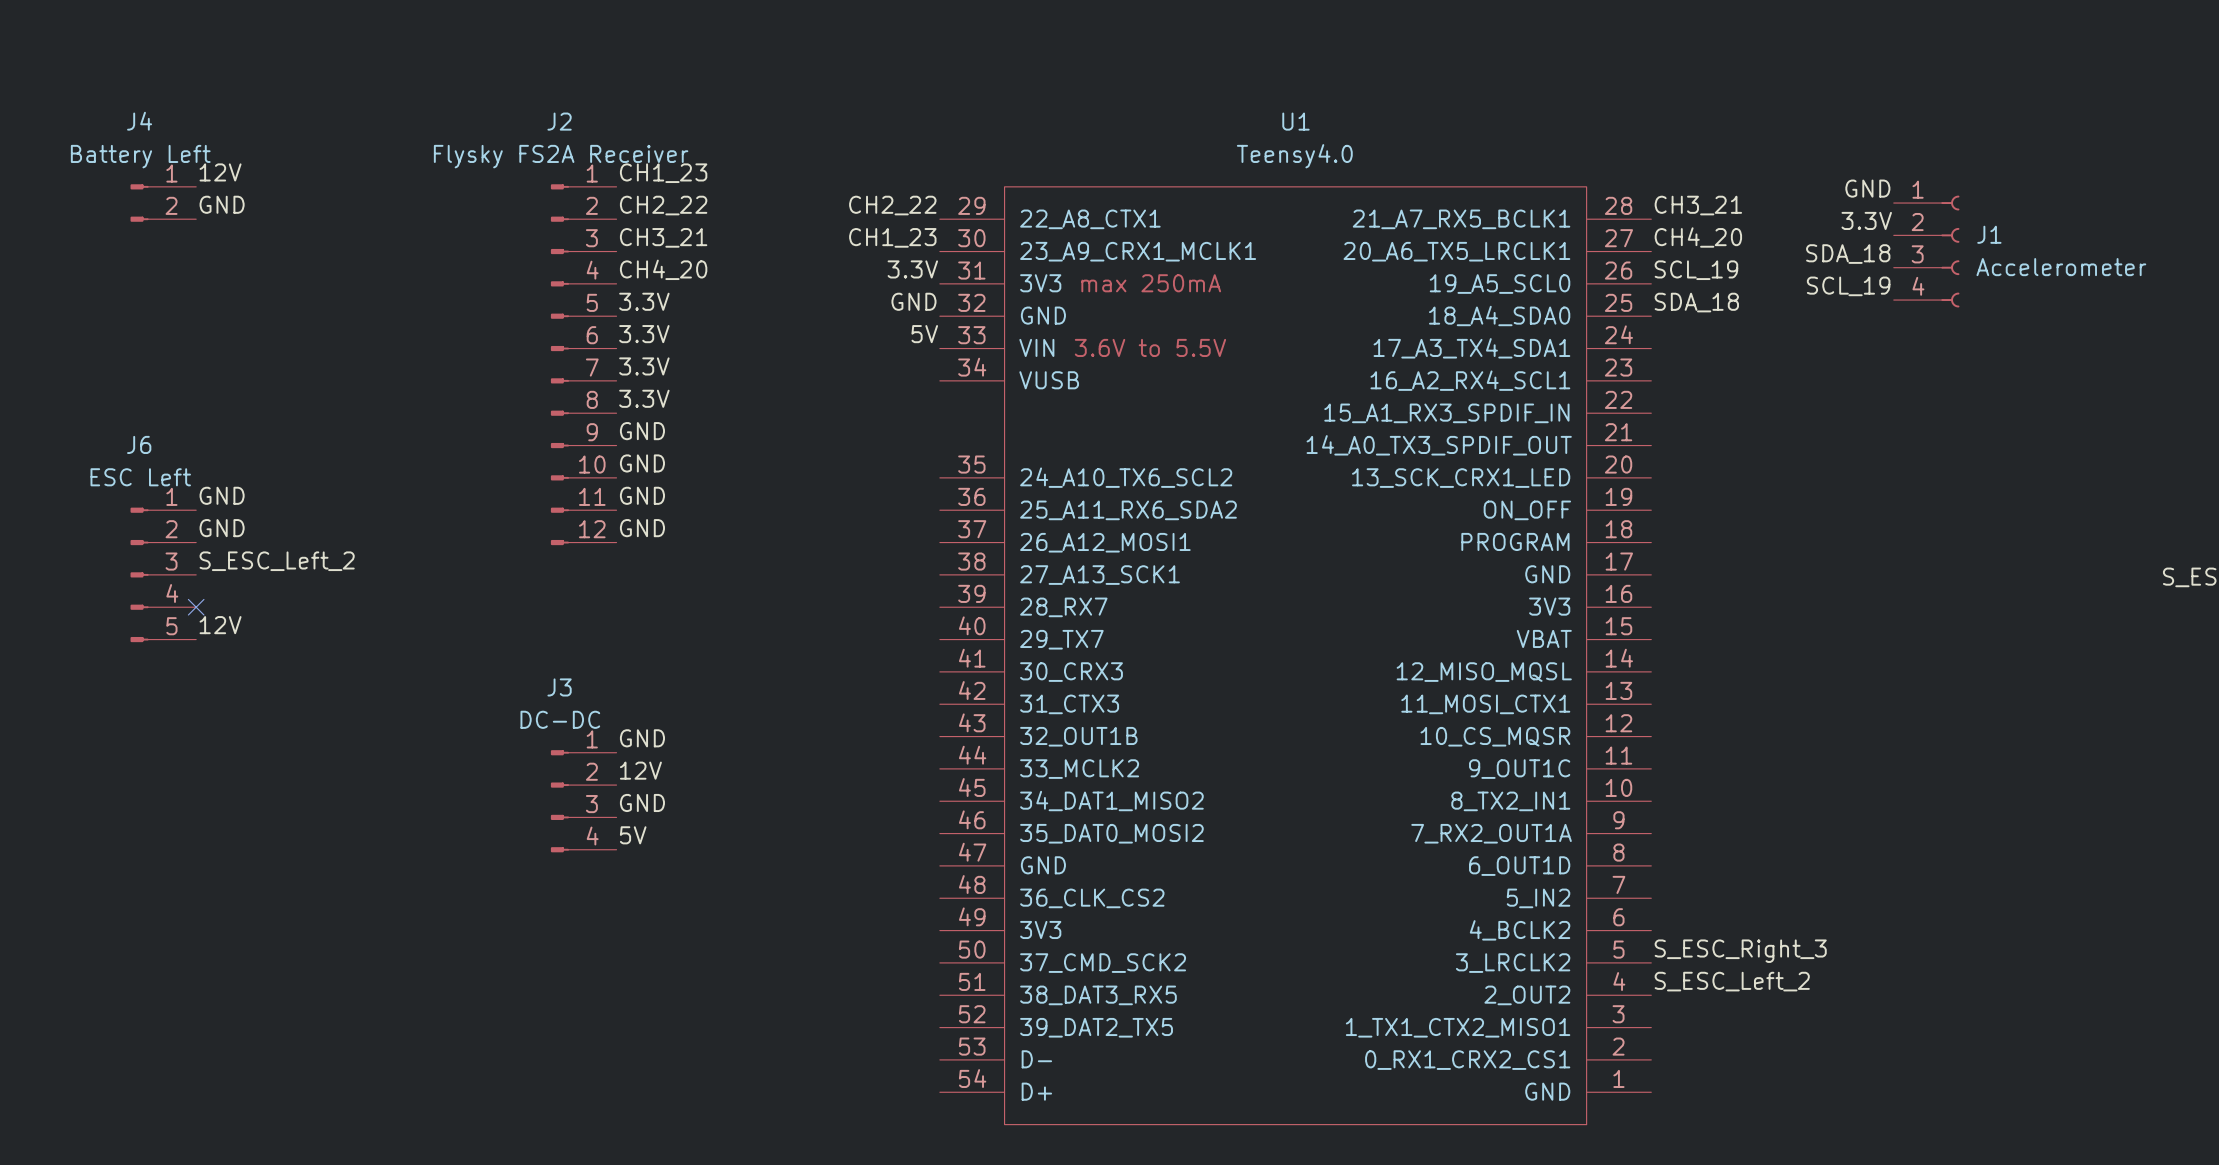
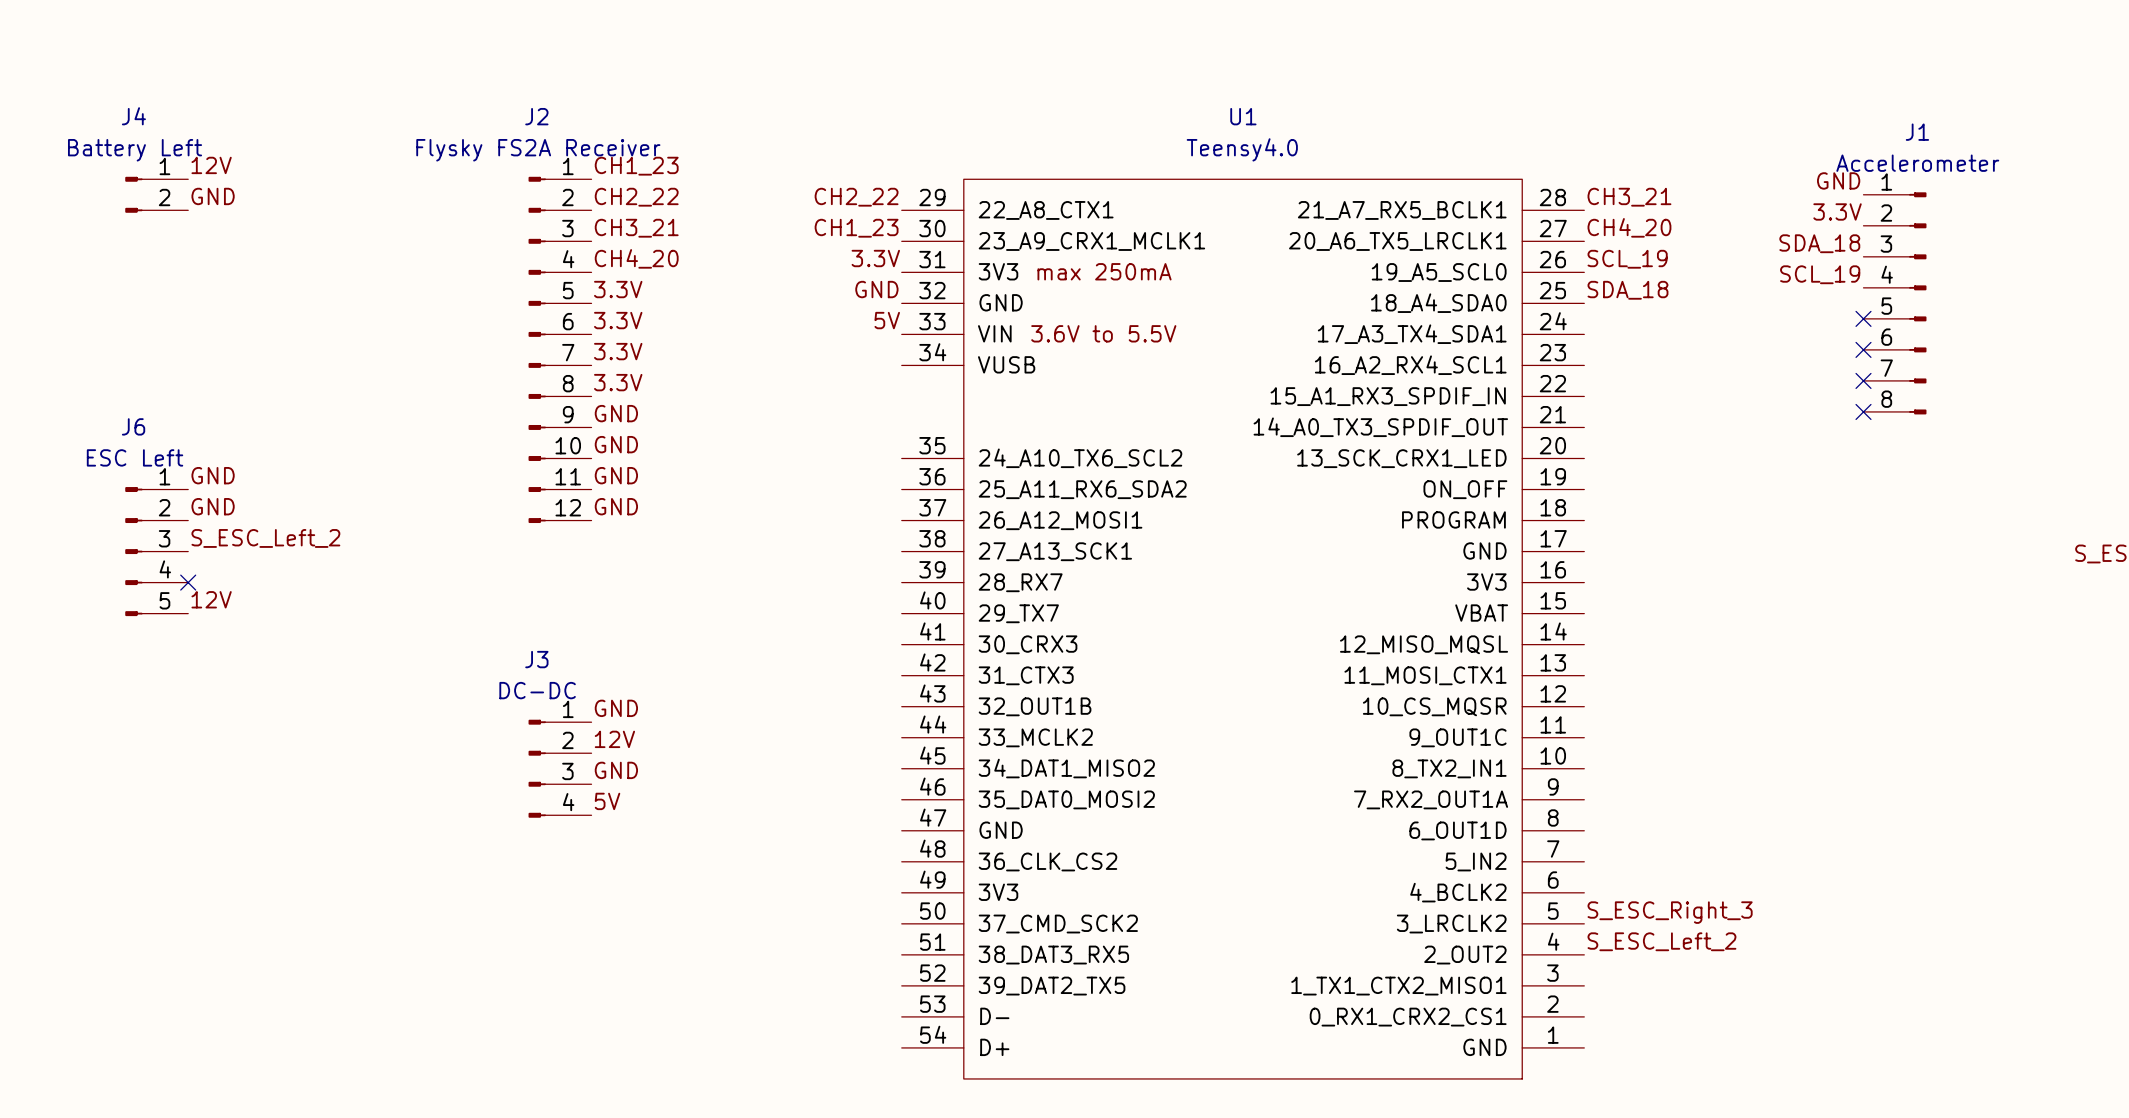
label position: GND (1867, 188) -> GND (1838, 180)
J1 symbol: [1893, 195, 1960, 308] -> [1863, 192, 1927, 415]
label position: 3.3V (1866, 220) -> 3.3V (1837, 211)
J1 name position: J1 (1989, 234) -> J1 (1917, 132)
label position: SDA_18 (1848, 254) -> SDA_18 (1819, 243)
J1 value position: Accelerometer (2061, 267) -> Accelerometer (1917, 163)
label position: SCL_19 (1848, 286) -> SCL_19 (1820, 274)
no-connect mark: none -> (1863, 318)
no-connect mark: none -> (1863, 349)
no-connect mark: none -> (1863, 380)
no-connect mark: none -> (1863, 411)

